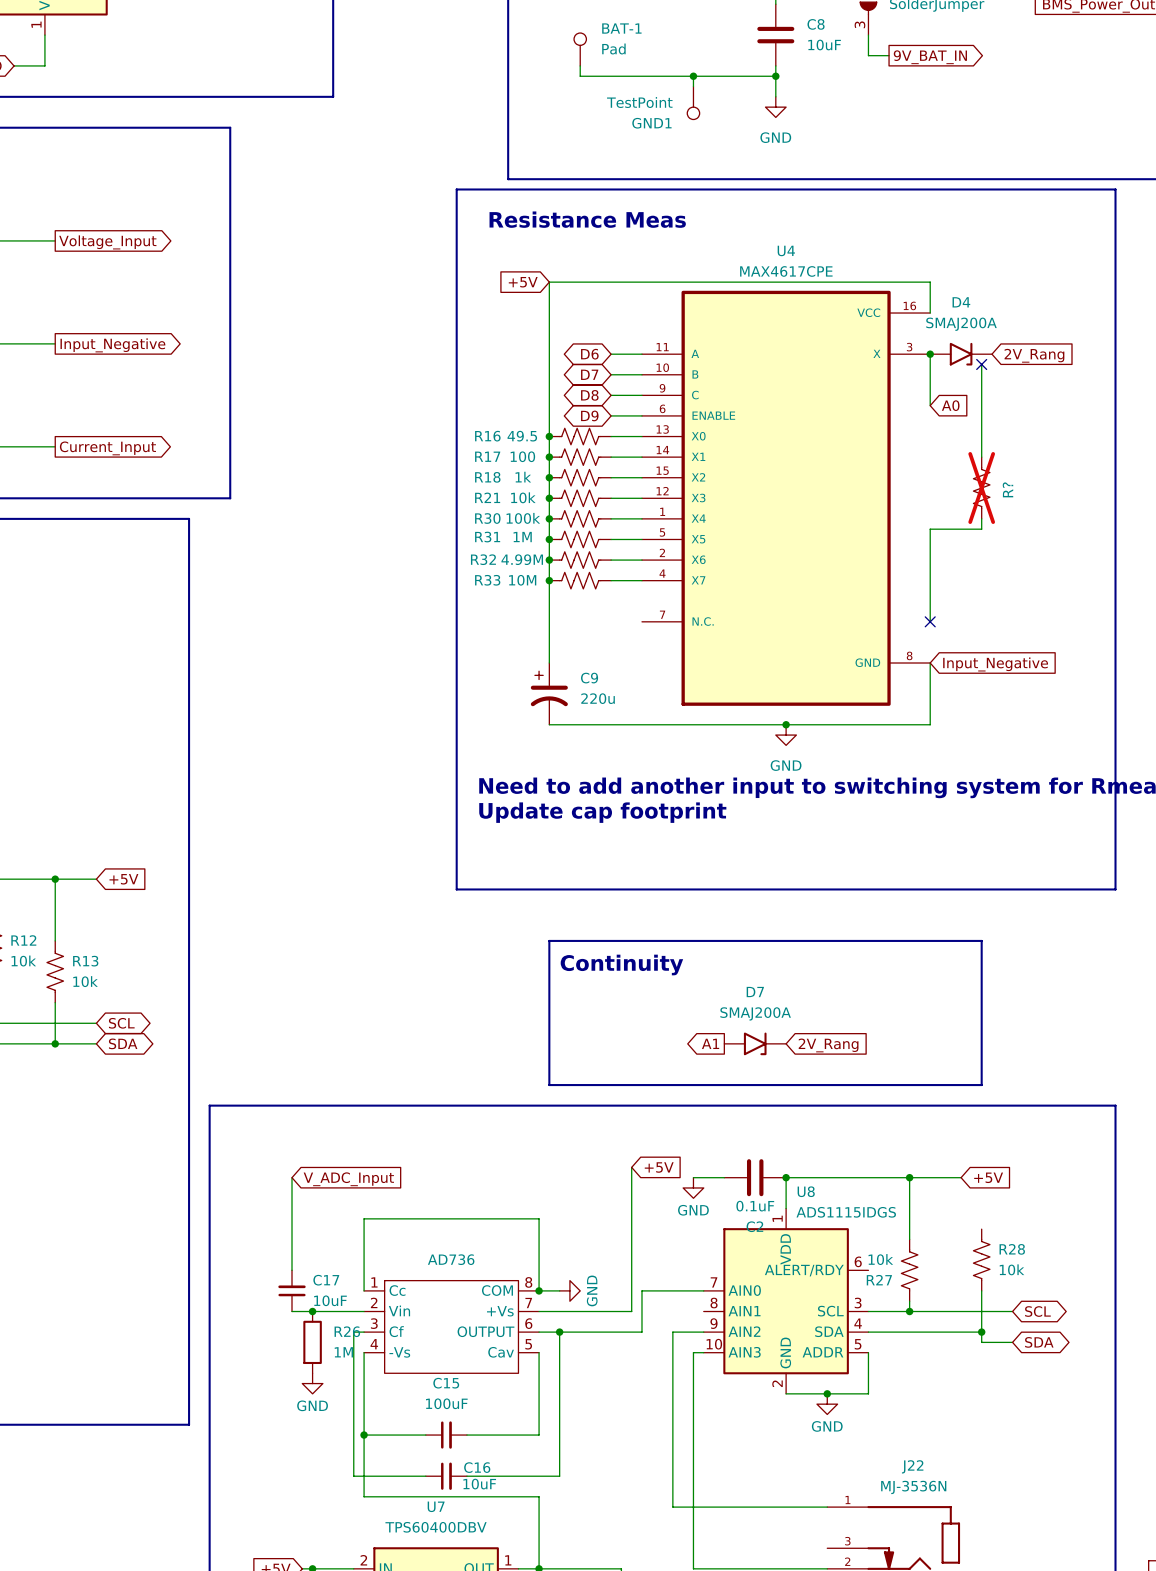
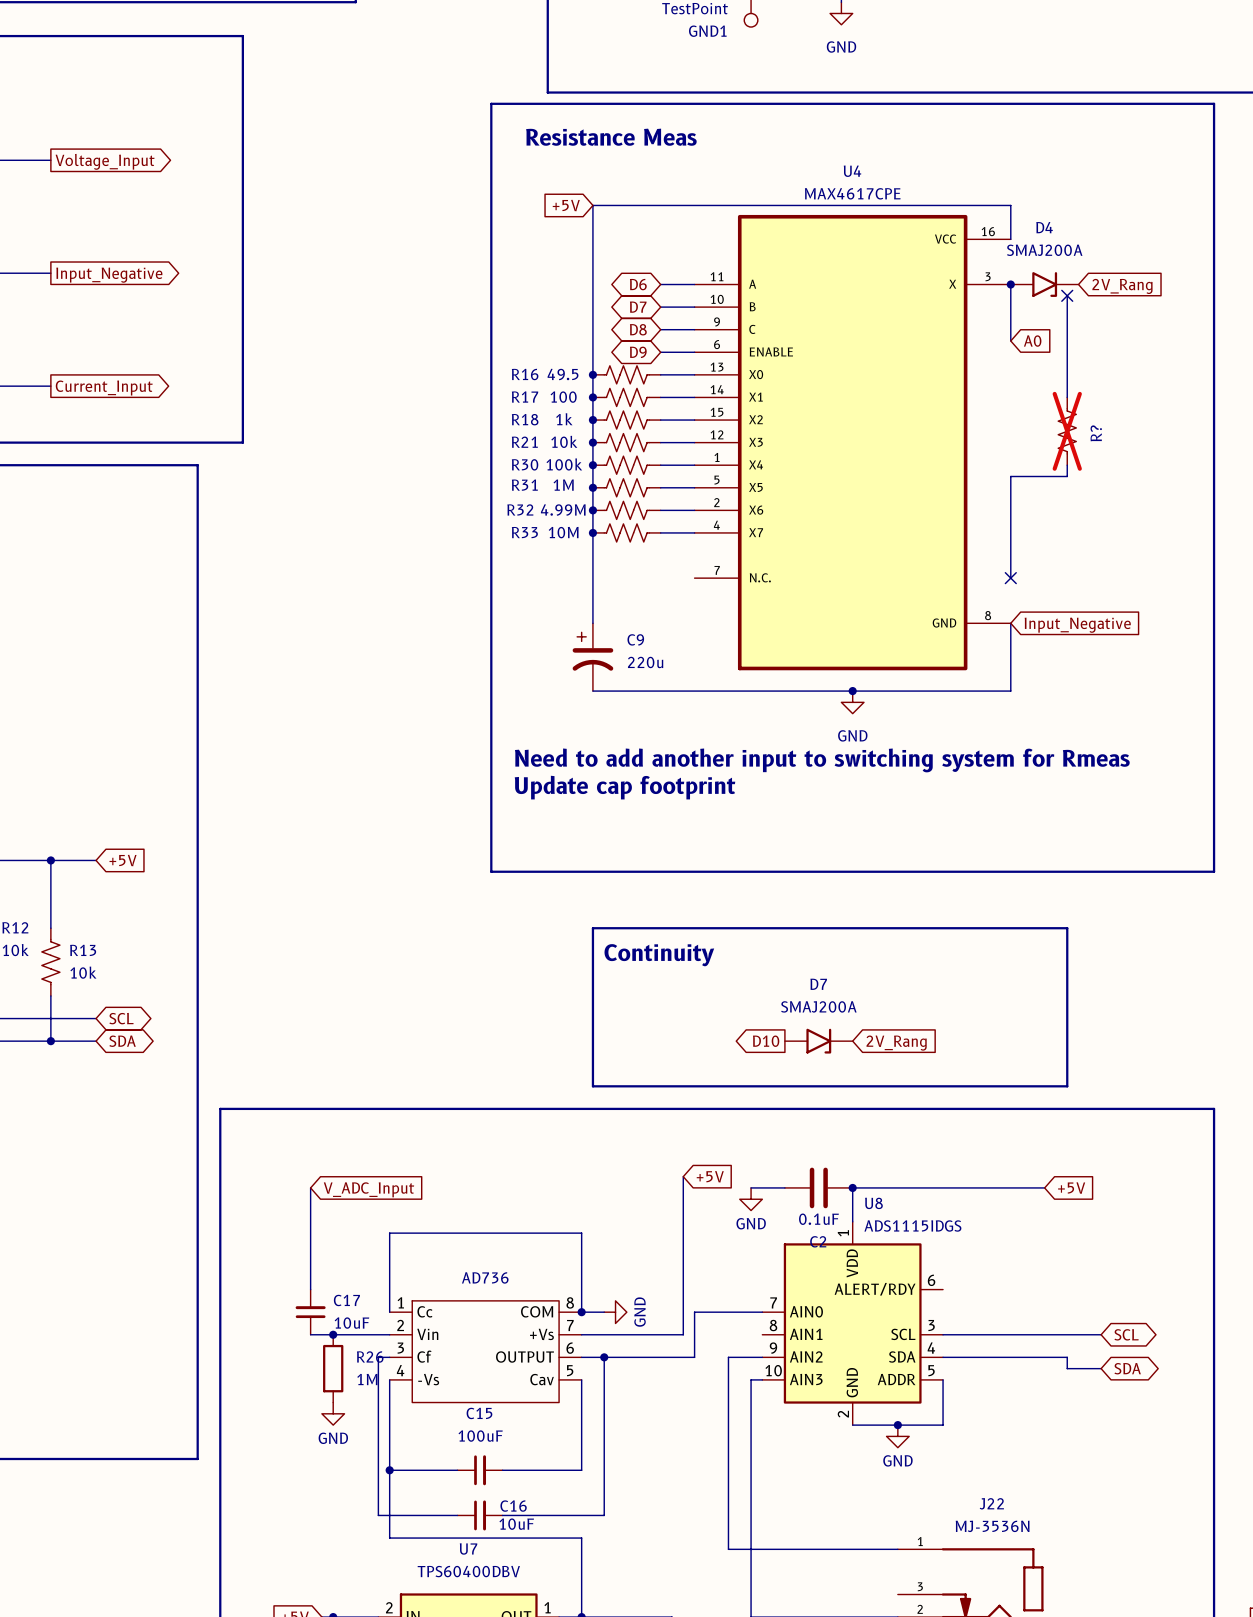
global label: A1 (710, 1043) -> D10 (766, 1041)
wire: (909, 1177) (909, 1239) -> none
junction: (909, 1177) -> none
R28: 10k (981, 1260) -> none
R27: 10k (909, 1270) -> none
wire: (981, 1290) (981, 1332) -> none
wire: (909, 1301) (909, 1311) -> none
junction: (909, 1311) -> none
junction: (981, 1332) -> none

